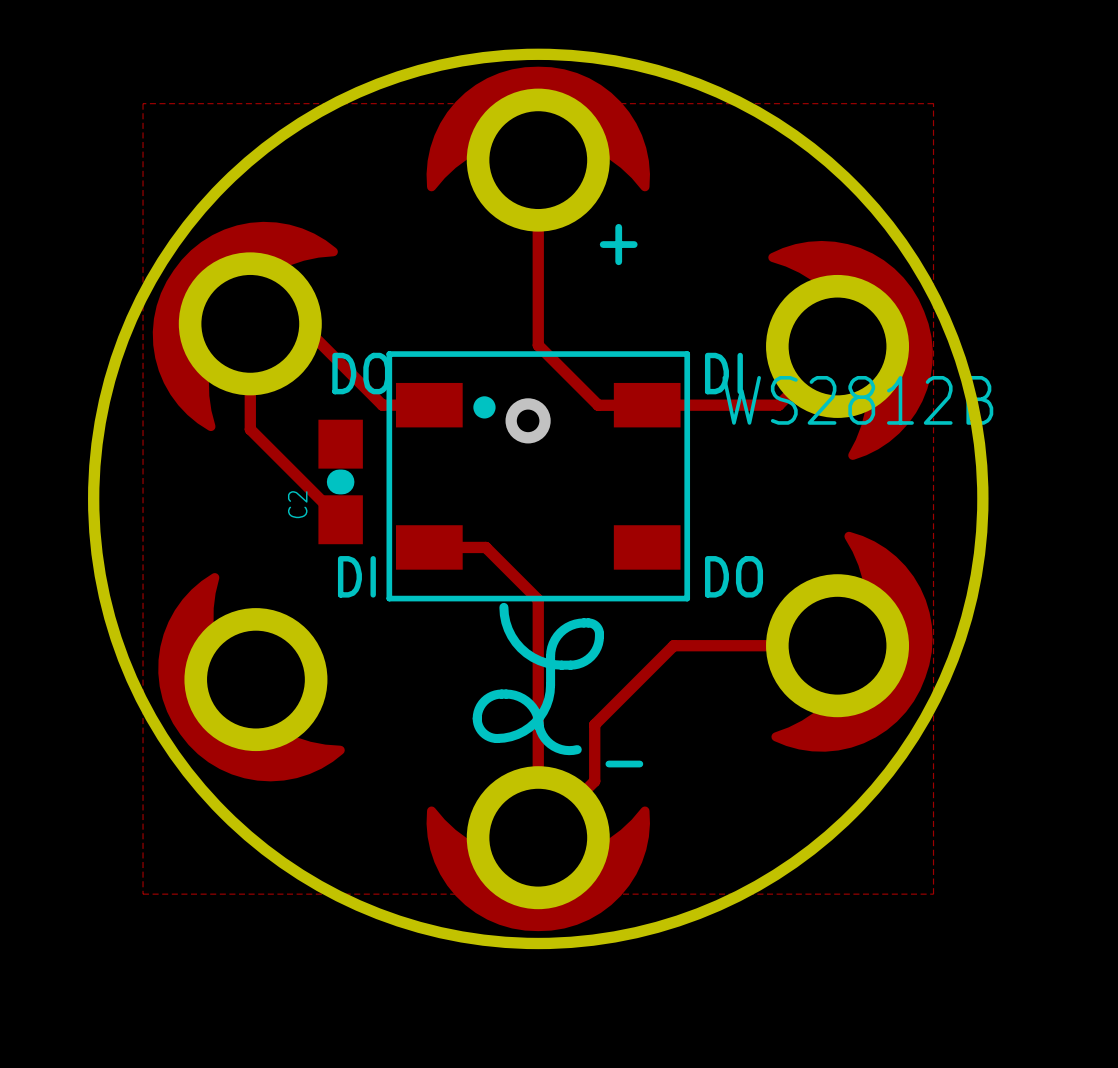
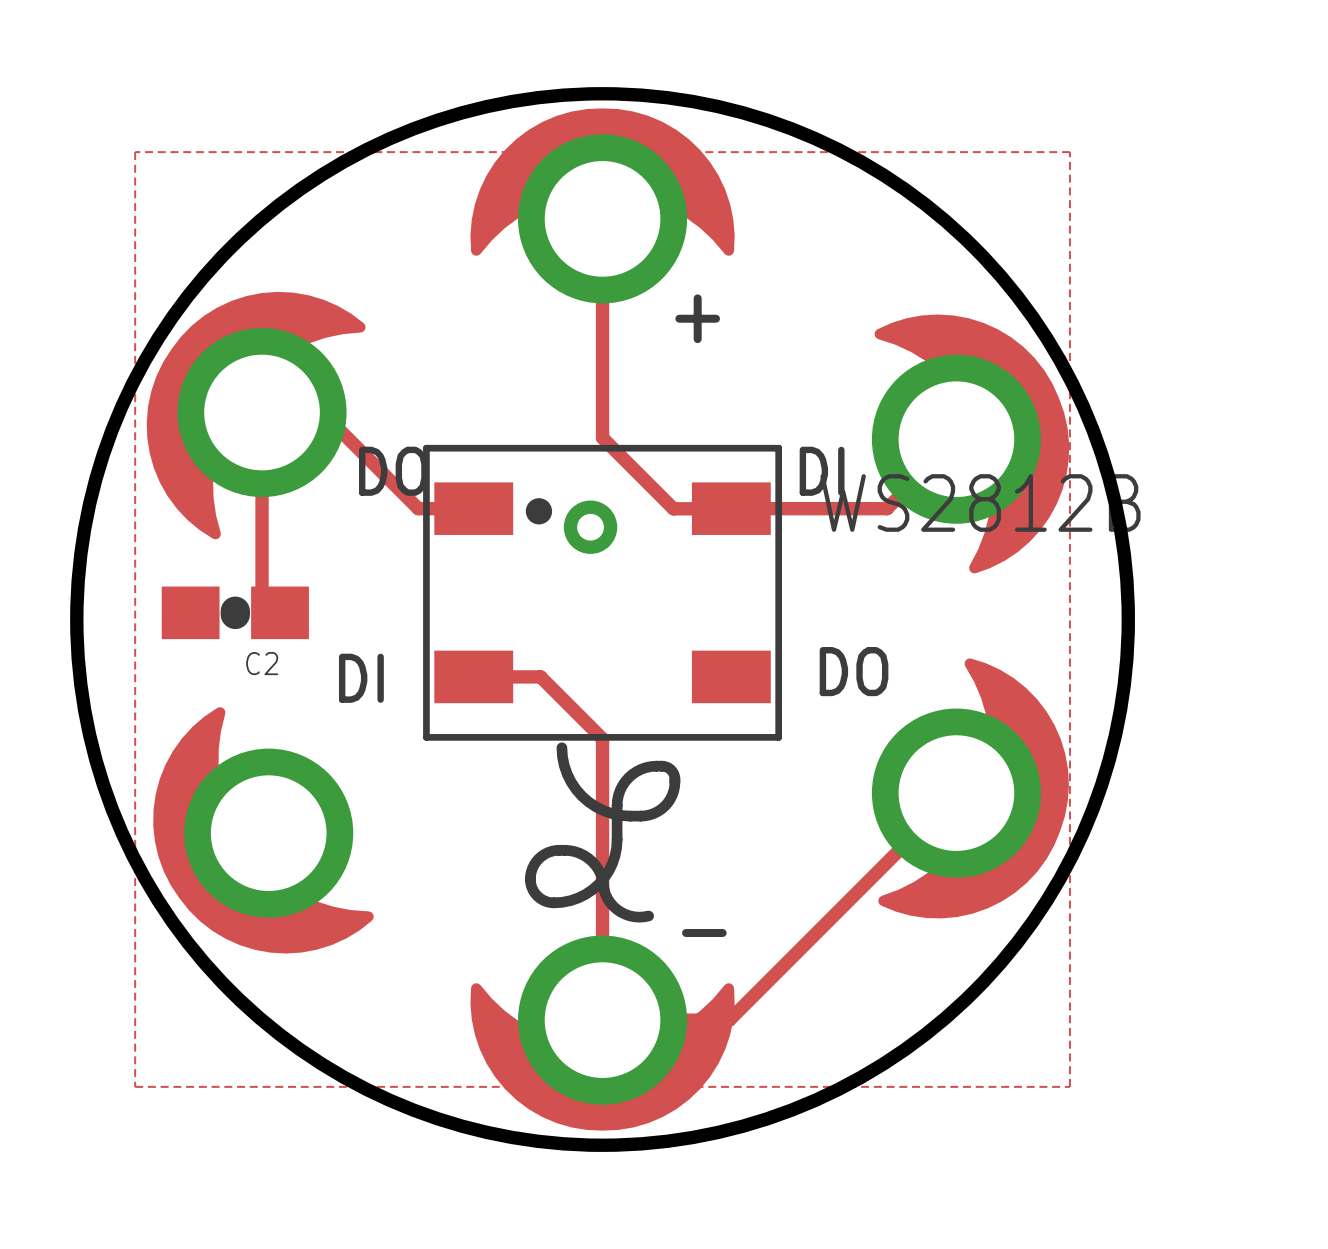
track: (250, 429) (340, 519) -> (262, 537) (262, 594) (280, 612)
C2 rotation: 0° (340, 481) -> 90° clockwise (235, 612)
C2 position: (340, 481) -> (235, 612)
text position: DI (356, 576) -> DI (361, 678)
text position: DO (734, 576) -> DO (854, 671)
track: (837, 645) (673, 645) (594, 724) (594, 781) (538, 837) -> (956, 793) (729, 1020) (602, 1020)

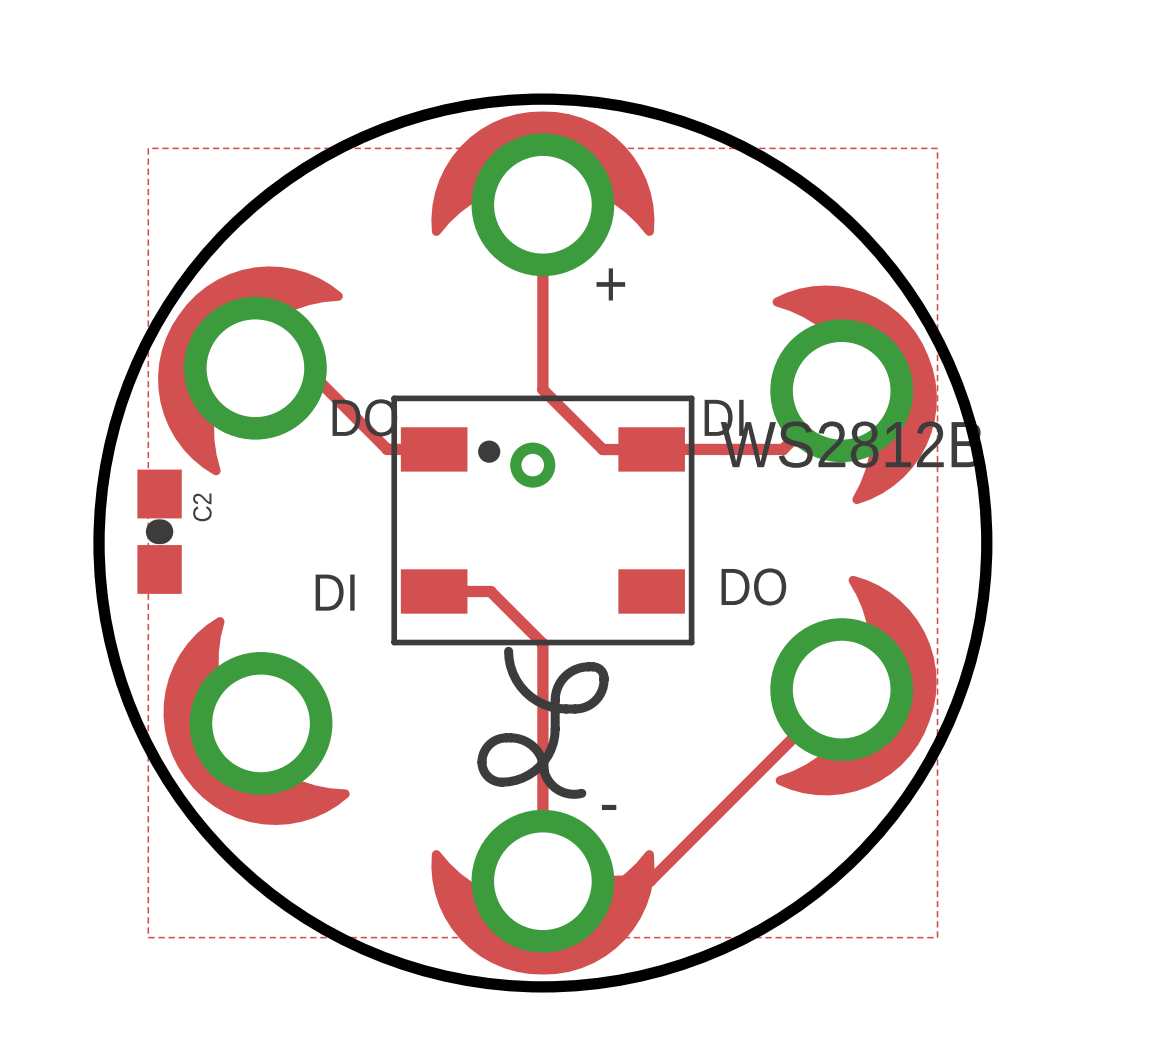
track: (262, 432) (262, 594) (280, 612) -> none
C2 rotation: 0° (235, 612) -> 90° clockwise (159, 531)

